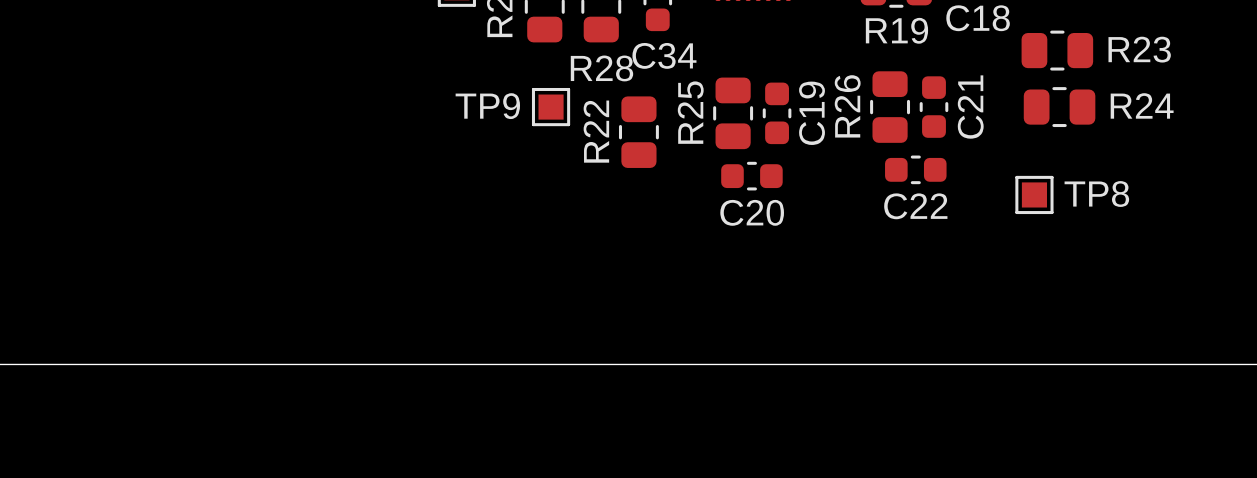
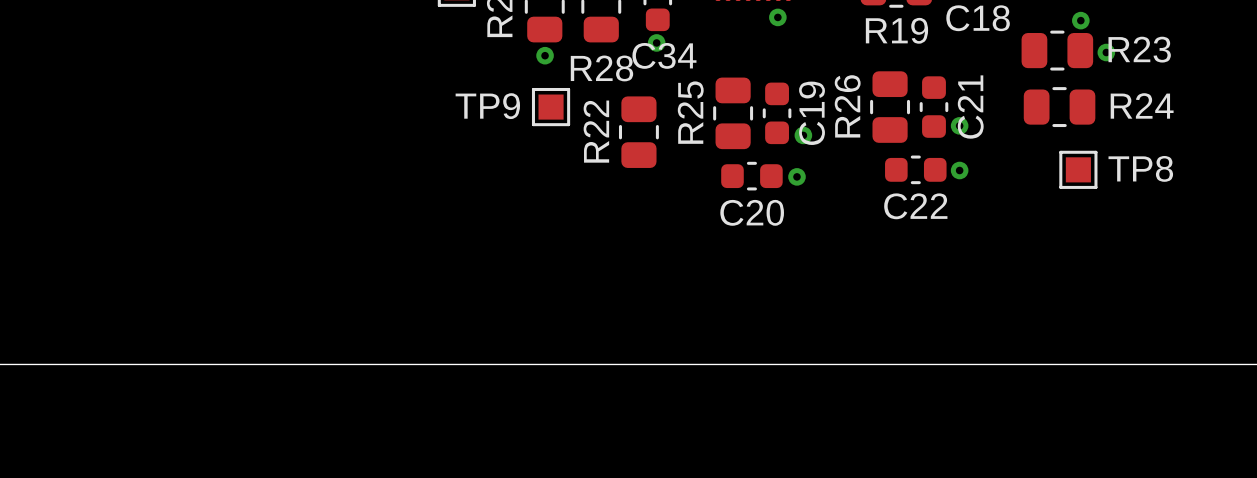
via: none -> (777, 17)
via: none -> (1080, 20)
via: none -> (656, 42)
via: none -> (1106, 52)
via: none -> (545, 55)
via: none -> (959, 125)
via: none -> (803, 135)
via: none -> (959, 170)
via: none -> (796, 176)
TP8 position: (1034, 194) -> (1078, 169)

